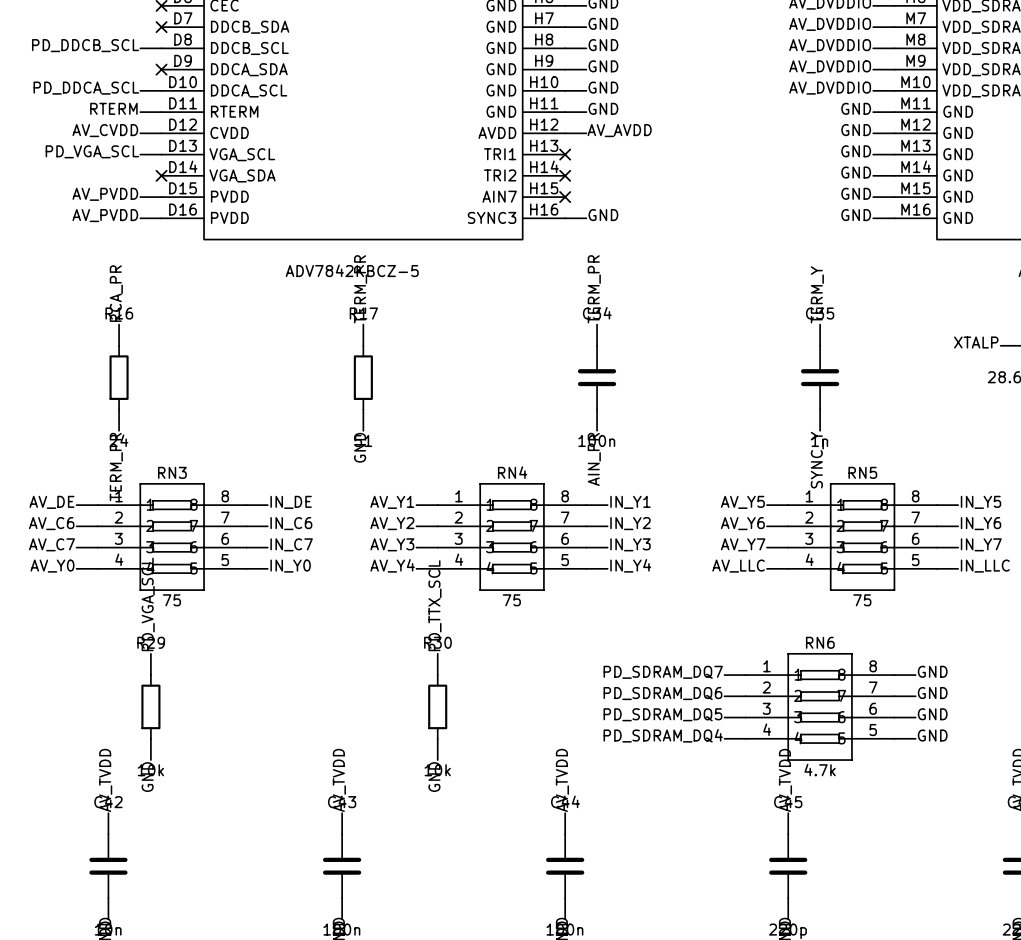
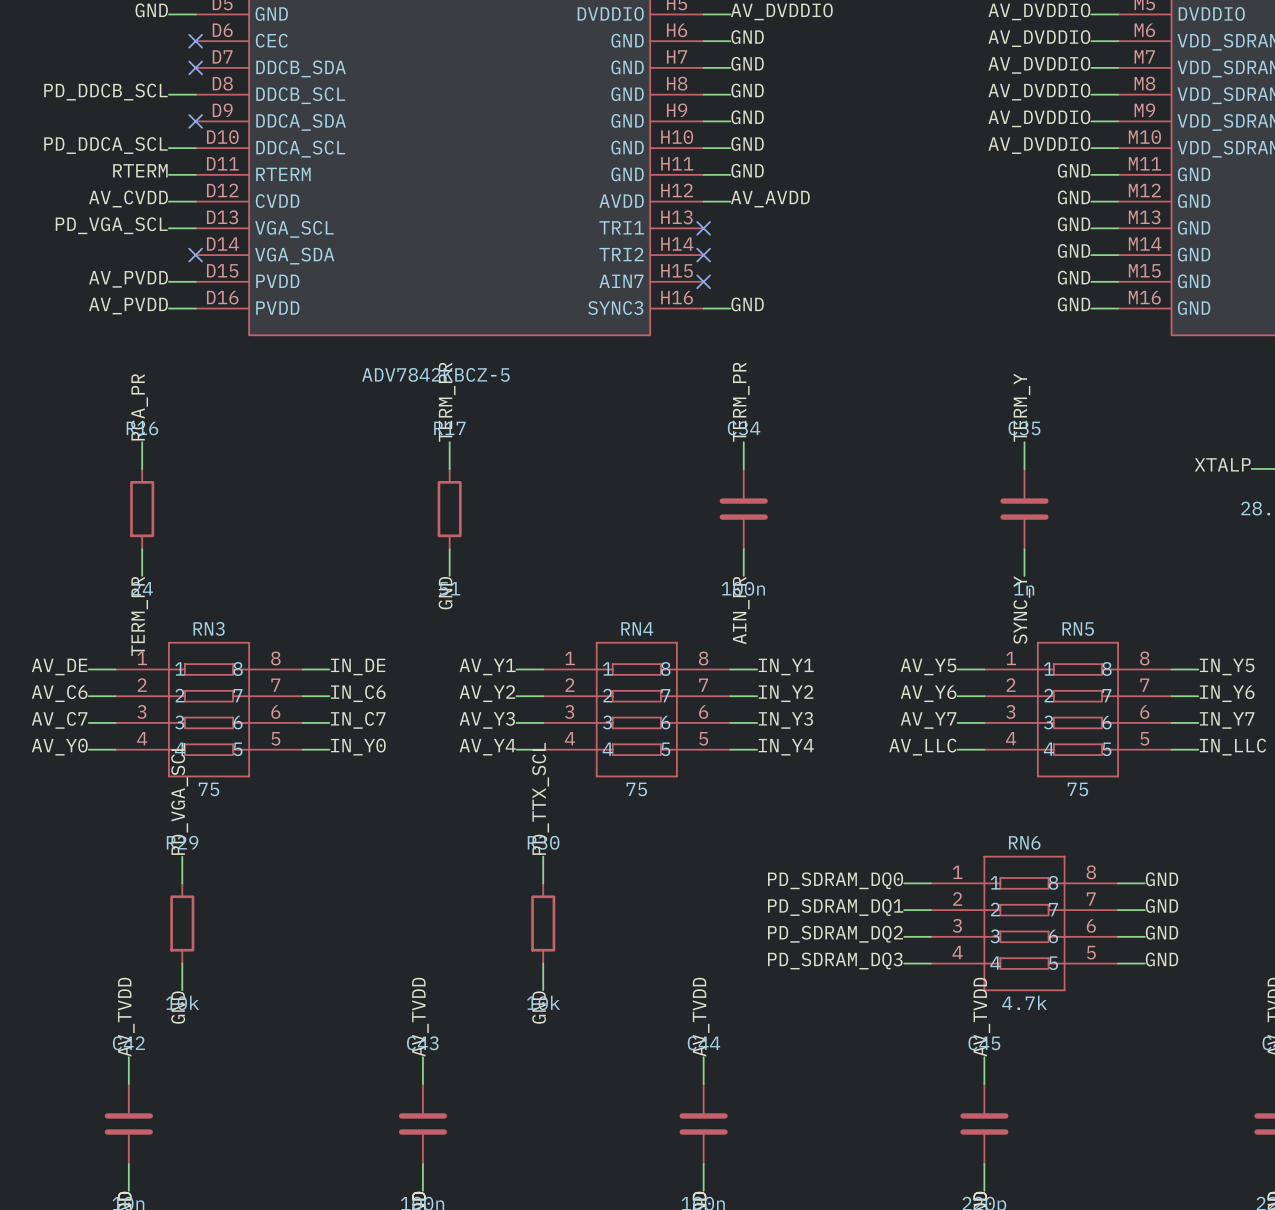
label: PD_SDRAM_DQ7 (663, 672) -> PD_SDRAM_DQ0 (835, 880)
label: PD_SDRAM_DQ6 (662, 693) -> PD_SDRAM_DQ1 (835, 907)
label: PD_SDRAM_DQ5 (662, 714) -> PD_SDRAM_DQ2 (835, 934)
label: PD_SDRAM_DQ4 (663, 735) -> PD_SDRAM_DQ3 (835, 960)

